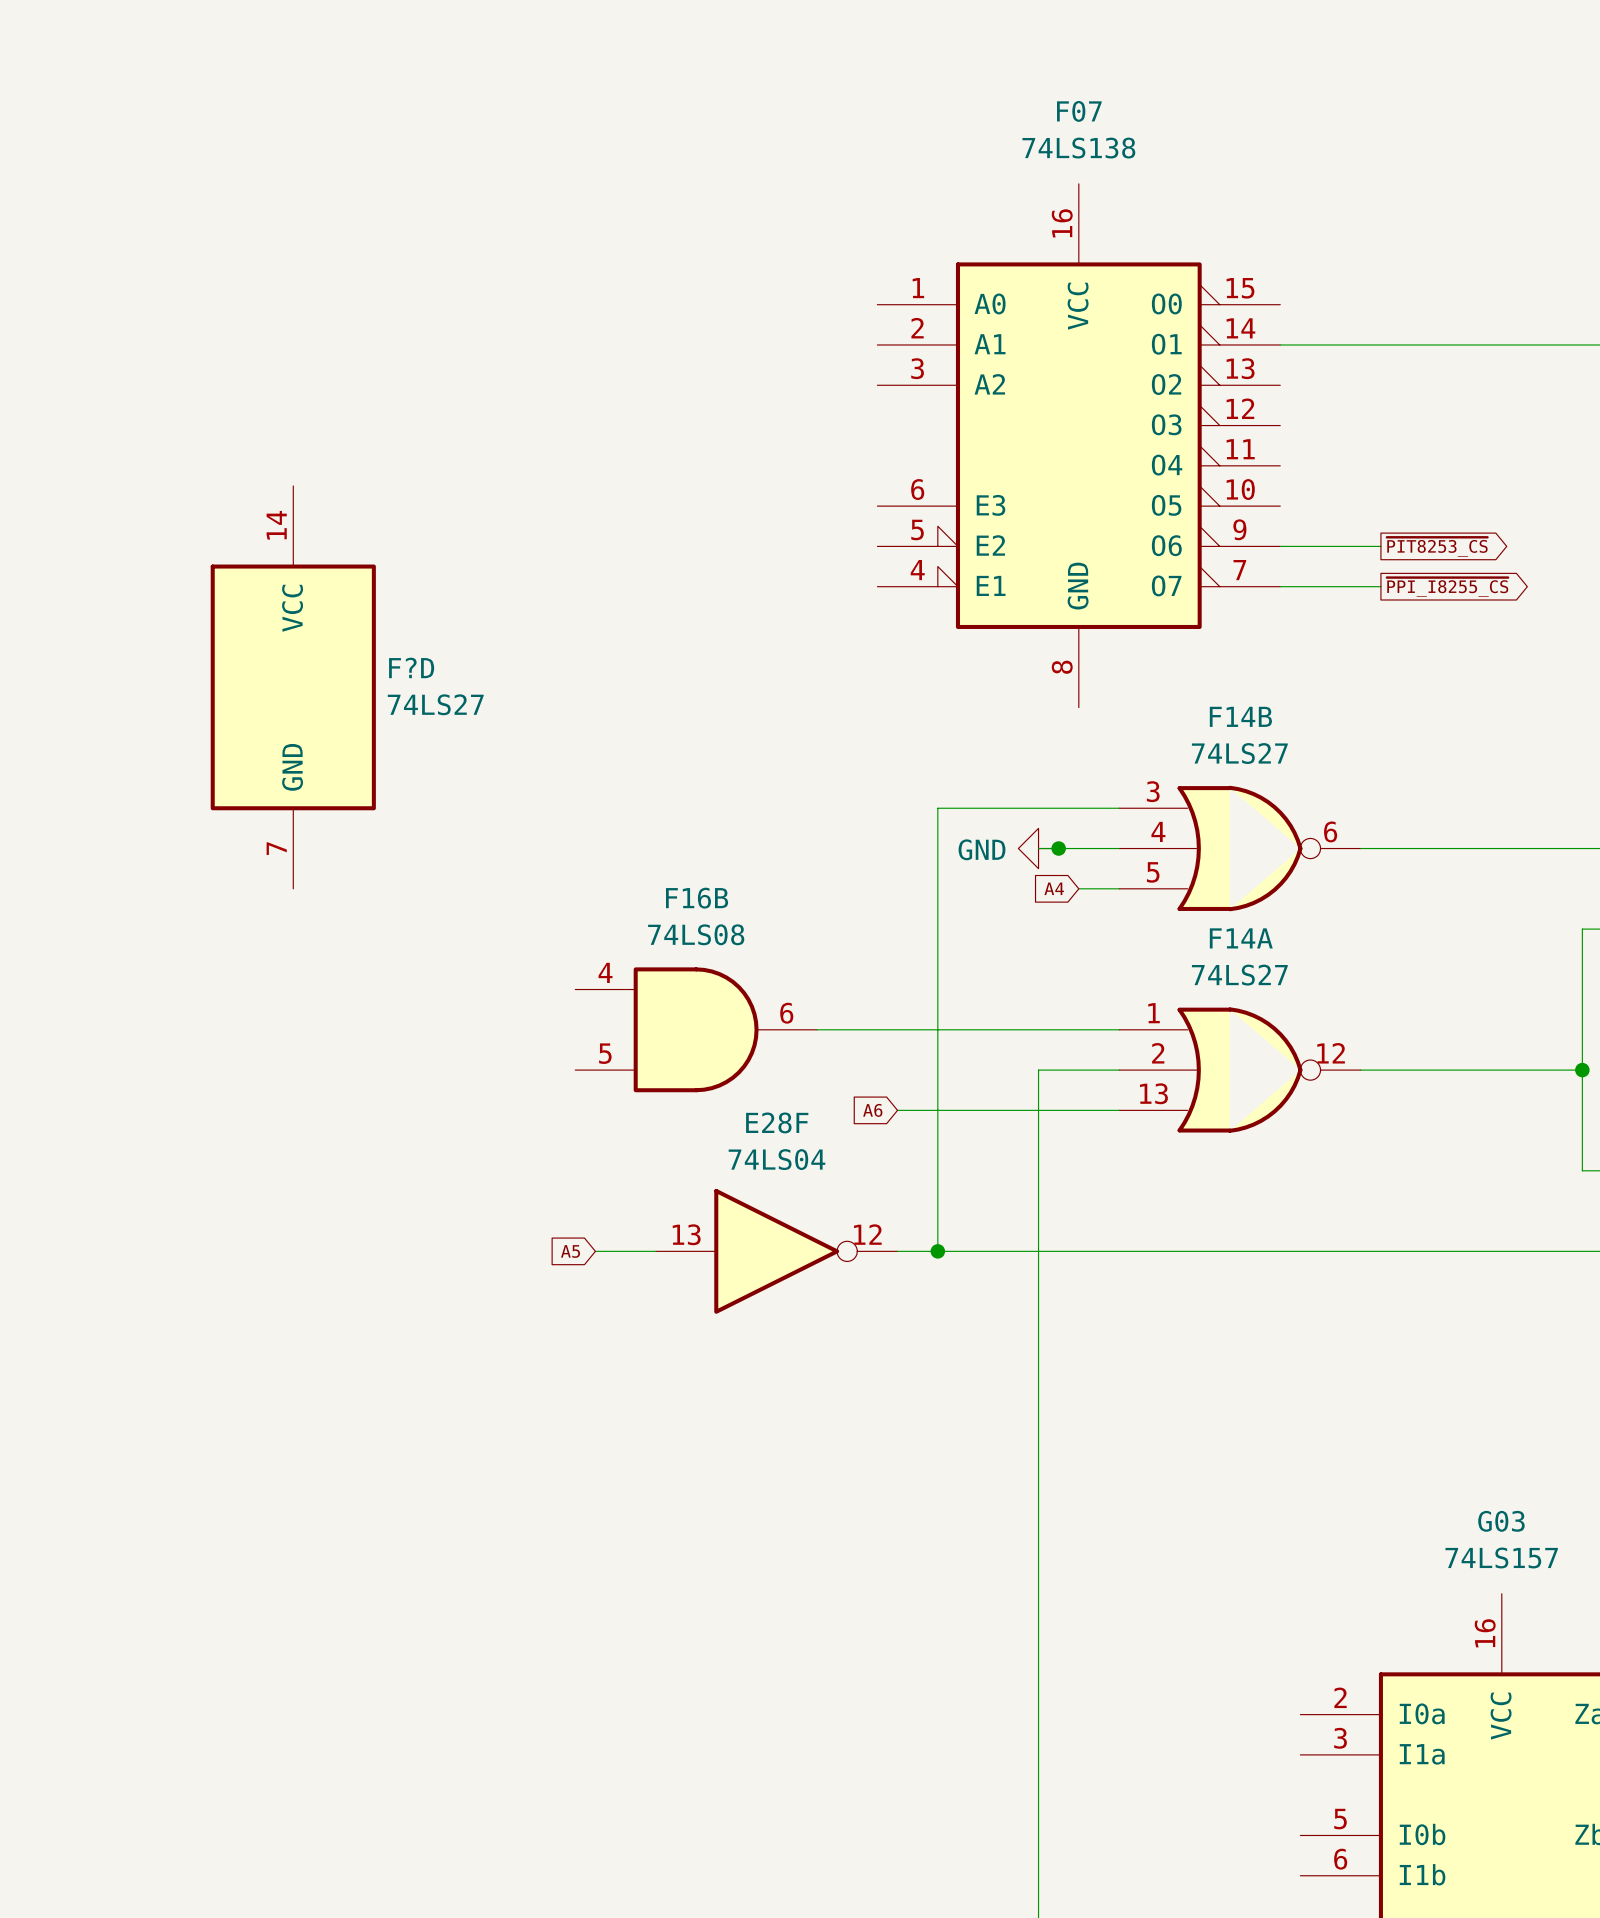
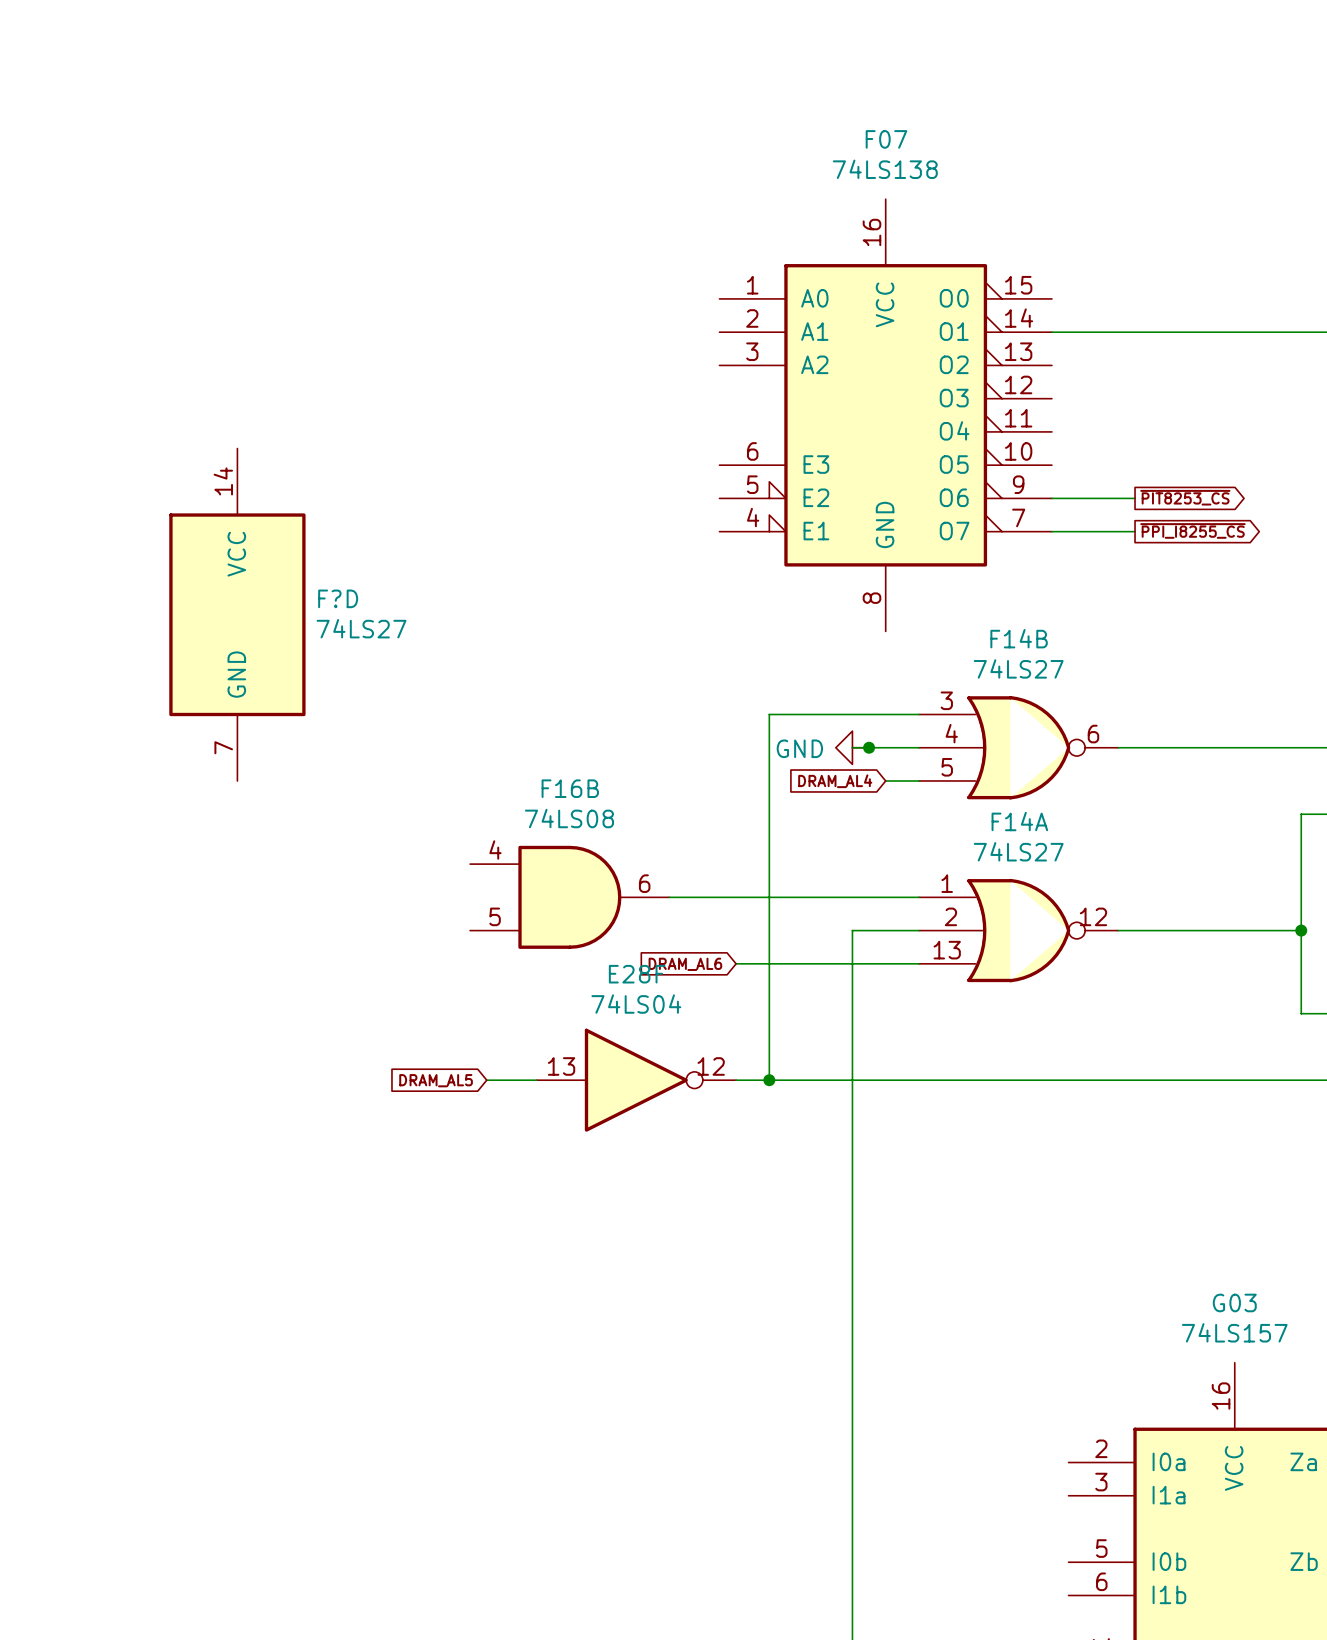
global label: A4 (1054, 888) -> DRAM_AL4 (835, 781)
global label: A6 (872, 1110) -> DRAM_AL6 (685, 964)
global label: A5 (570, 1251) -> DRAM_AL5 (436, 1080)

